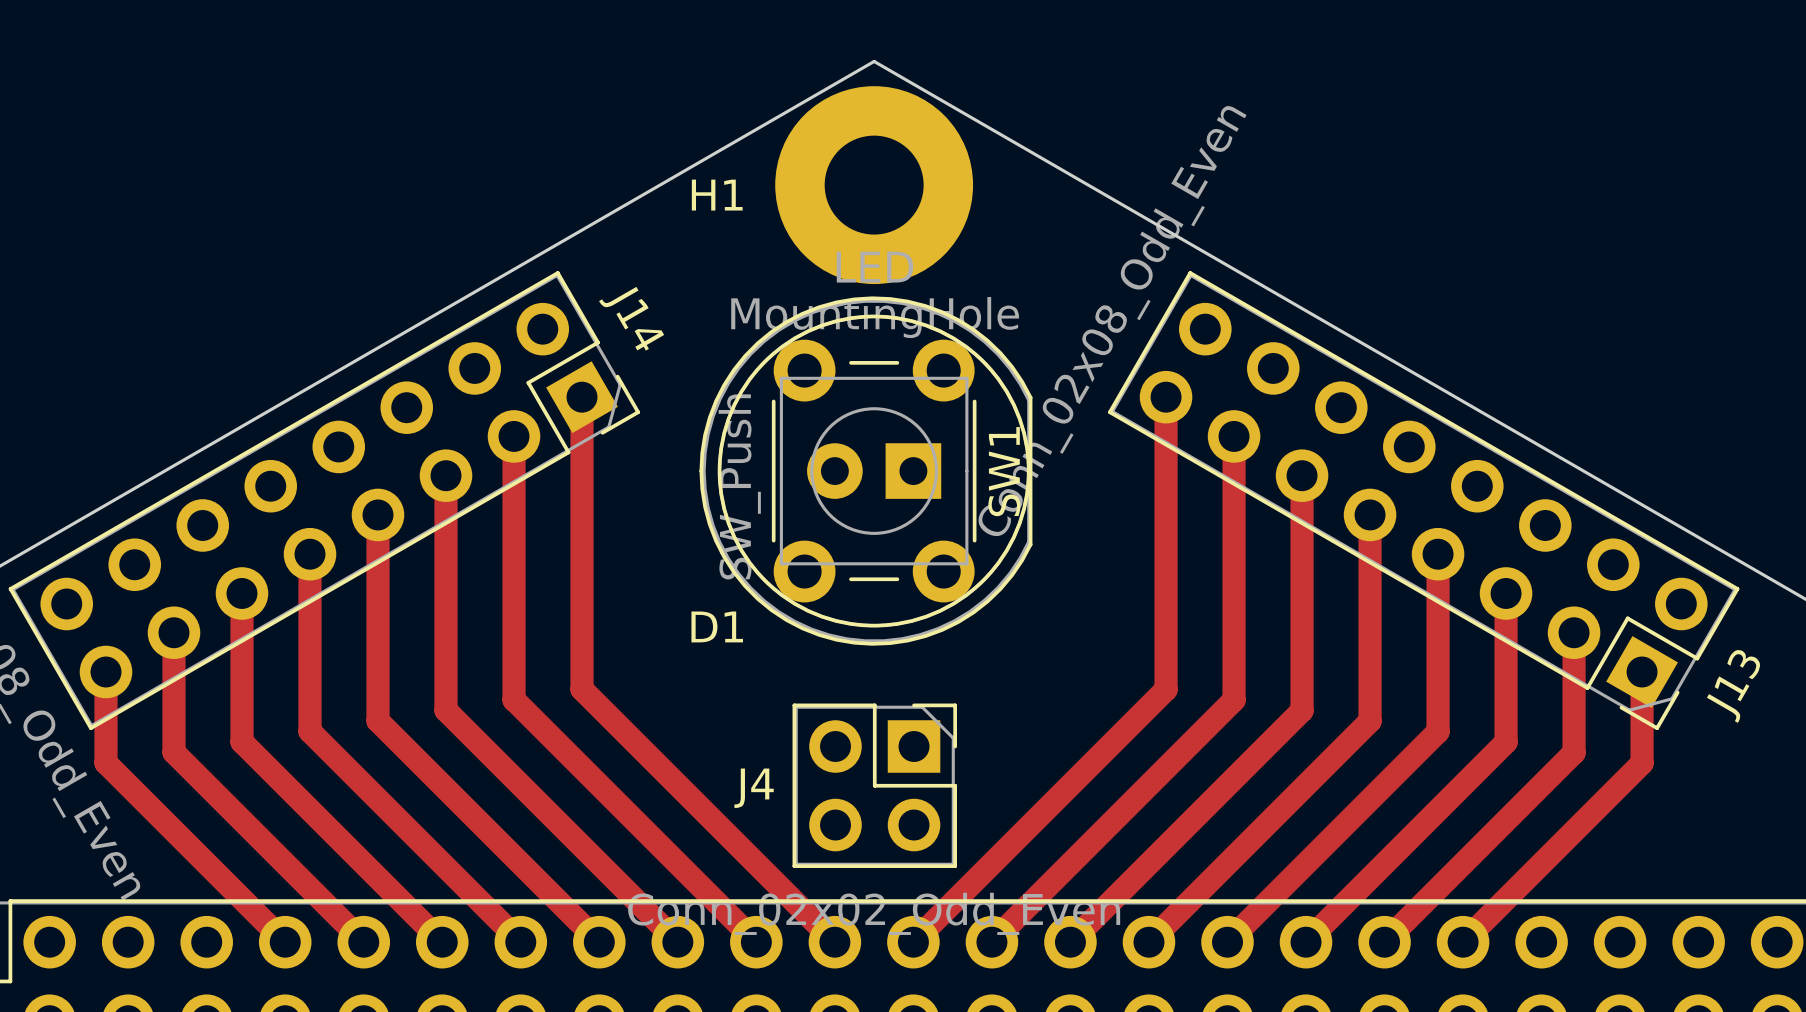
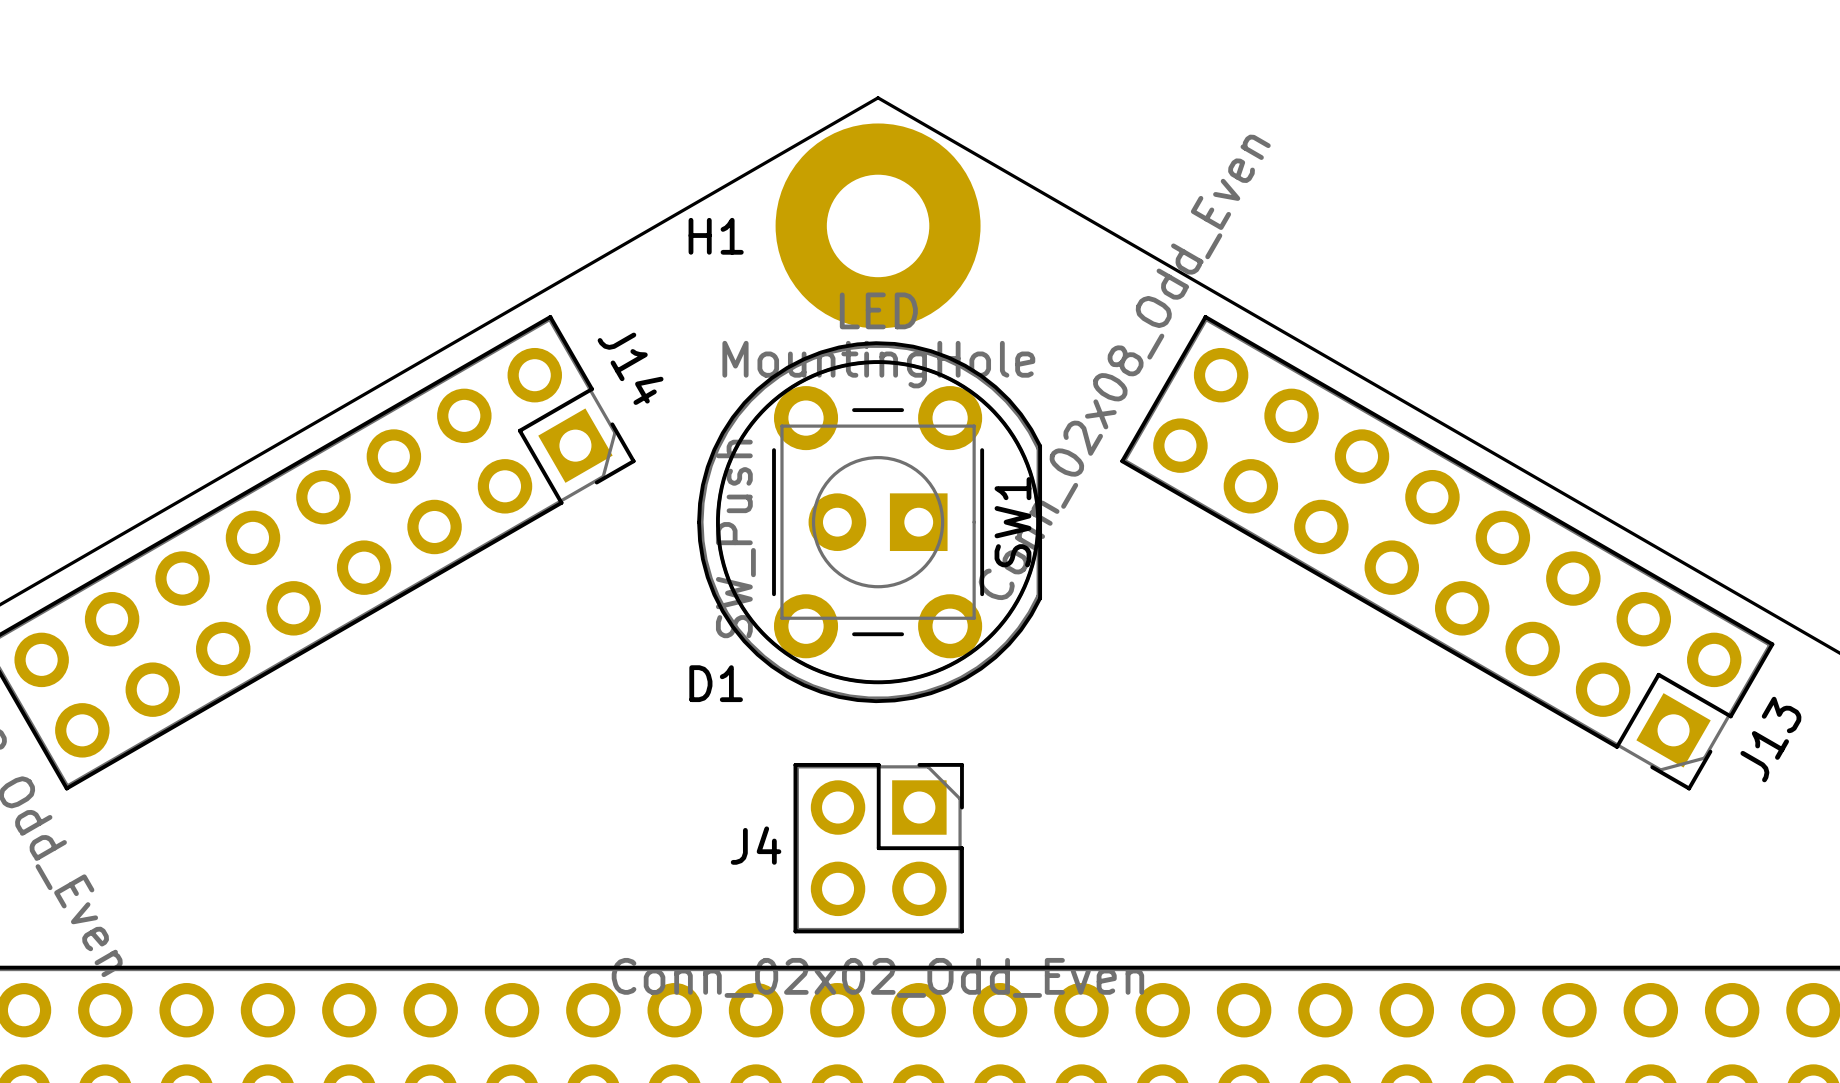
track: (582, 397) (582, 689) (834, 942) -> none
track: (1166, 397) (1166, 689) (913, 942) -> none
track: (514, 436) (514, 699) (756, 942) -> none
track: (1234, 436) (1234, 700) (991, 942) -> none
track: (446, 475) (446, 710) (677, 942) -> none
track: (1302, 475) (1302, 710) (1070, 942) -> none
track: (378, 514) (378, 720) (599, 942) -> none
track: (1370, 514) (1370, 721) (1148, 942) -> none
track: (310, 554) (310, 731) (520, 942) -> none
track: (1438, 554) (1438, 731) (1227, 942) -> none
track: (242, 593) (242, 741) (442, 942) -> none
track: (1506, 593) (1506, 742) (1306, 942) -> none
track: (173, 632) (173, 752) (363, 942) -> none
track: (1574, 632) (1574, 752) (1384, 942) -> none
track: (105, 672) (105, 762) (285, 942) -> none
track: (1642, 672) (1642, 763) (1463, 942) -> none

